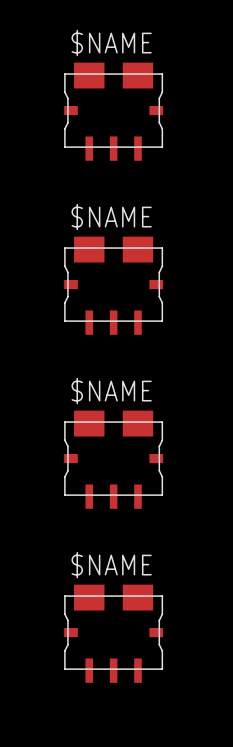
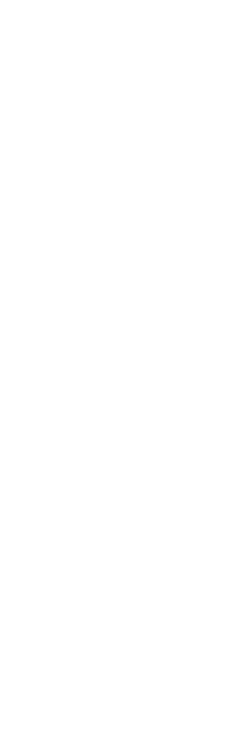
part: (113, 111) -> none
part: (113, 285) -> none
part: (113, 459) -> none
part: (113, 633) -> none

